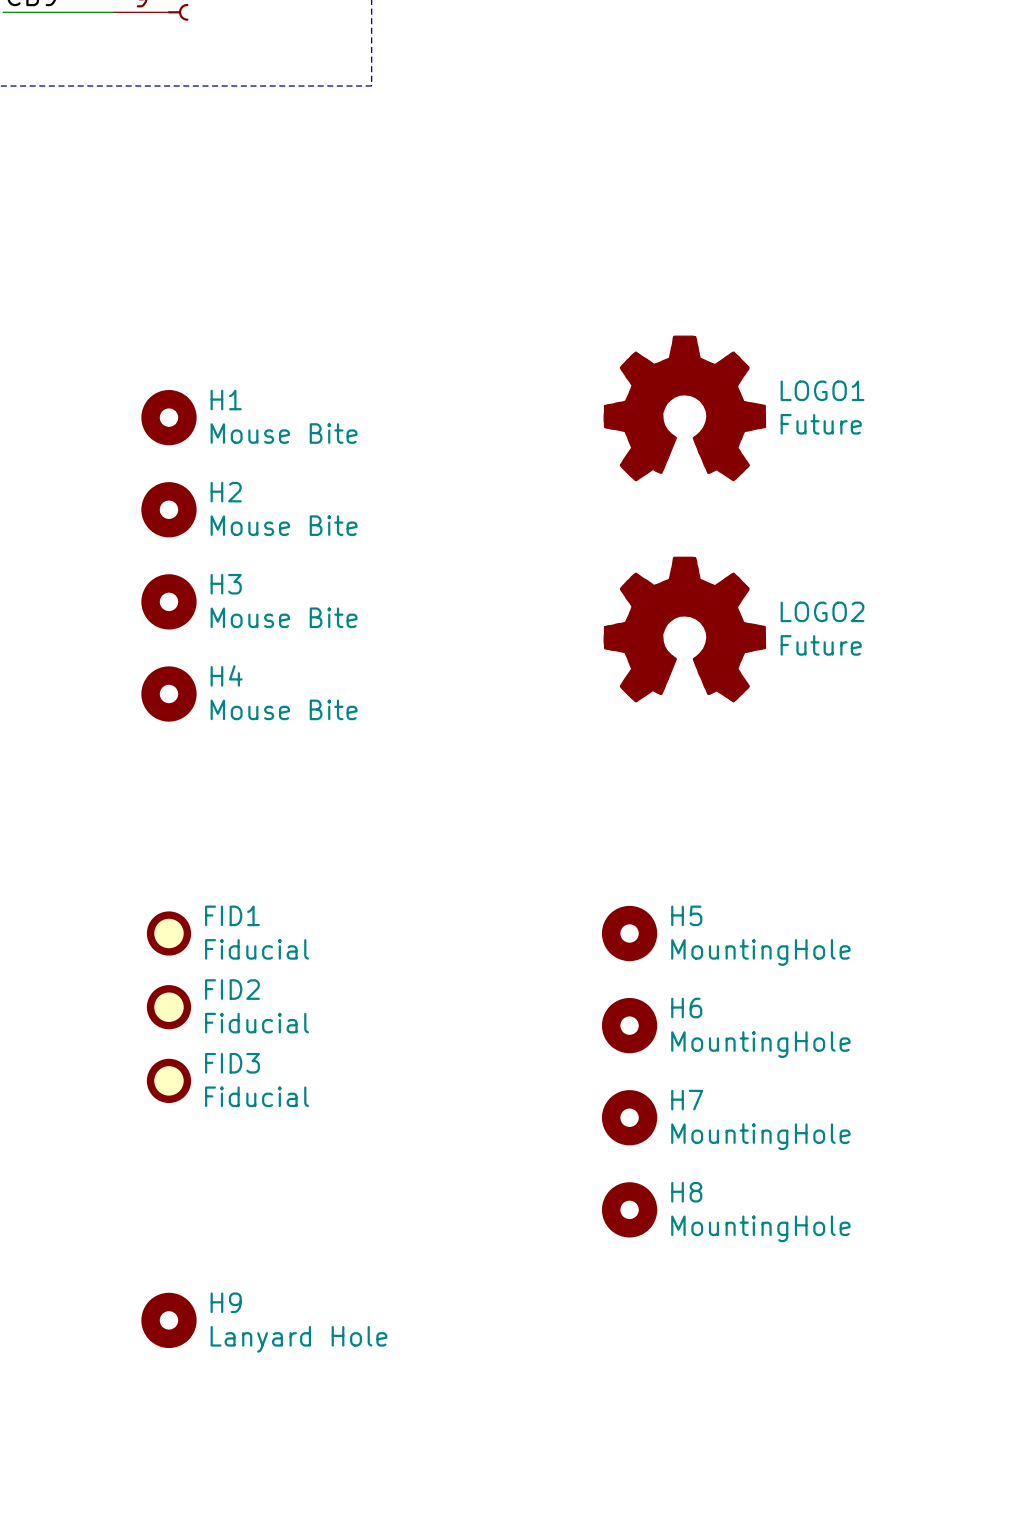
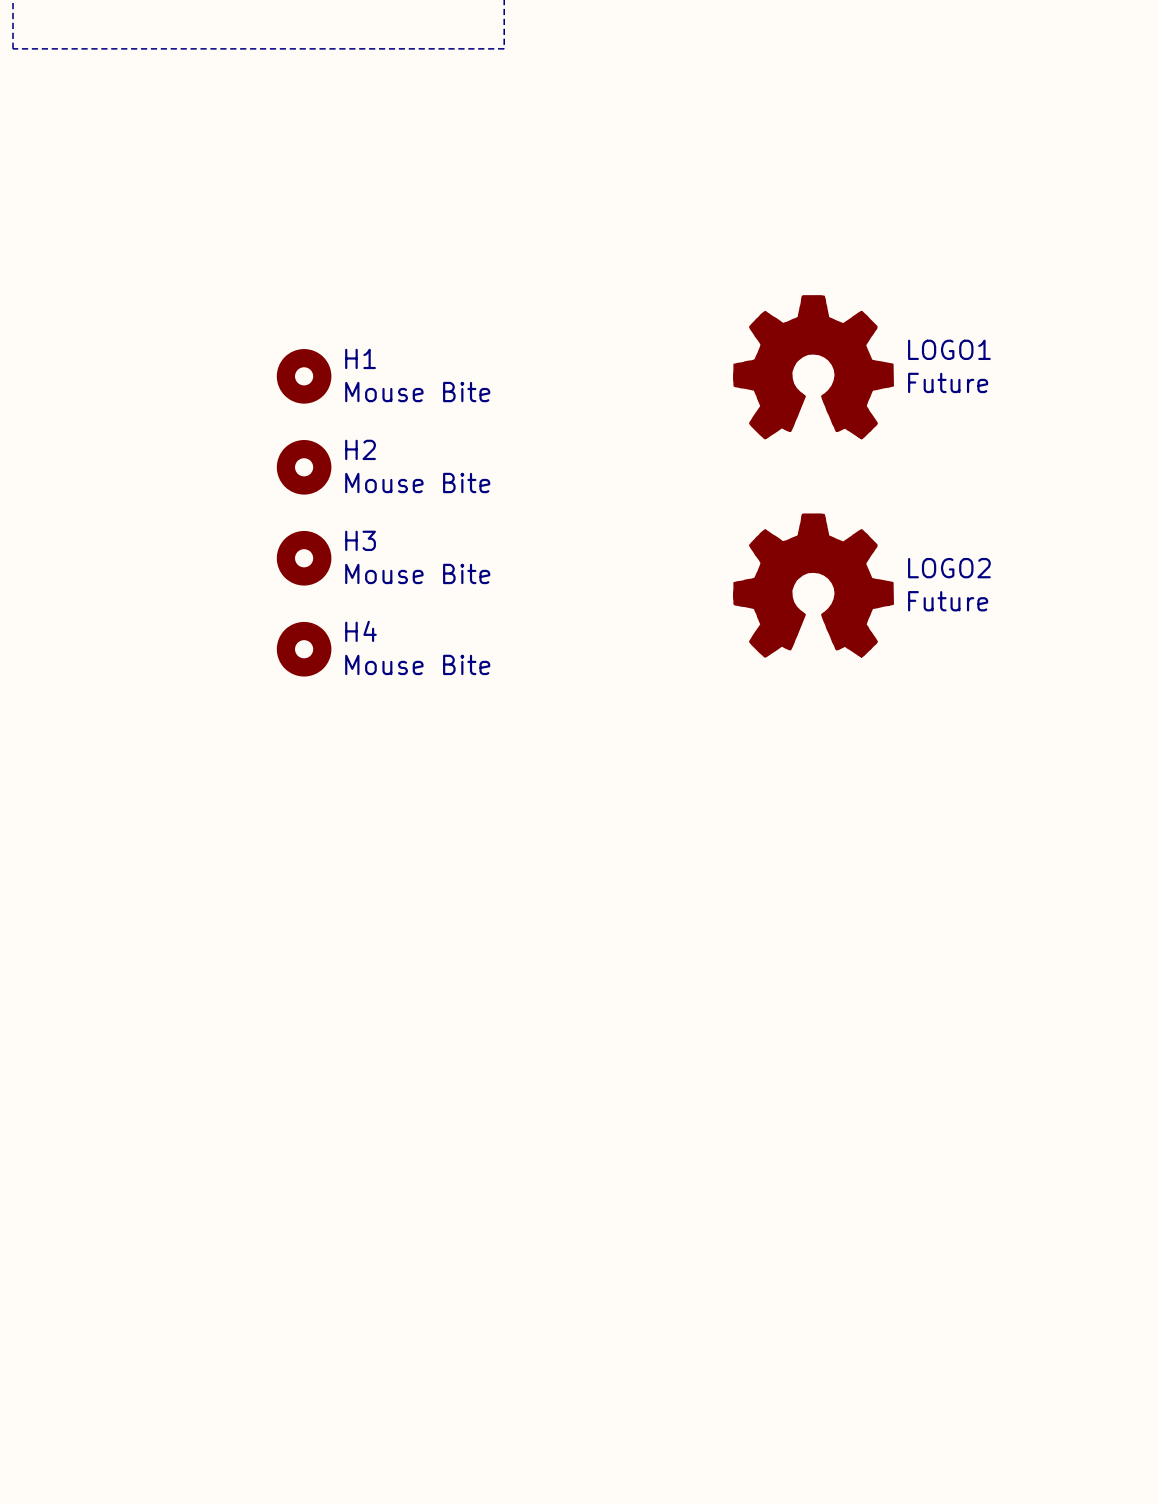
FID1: Fiducial (168, 933) -> none
H5: MountingHole (629, 933) -> none
FID2: Fiducial (168, 1007) -> none
H6: MountingHole (629, 1025) -> none
FID3: Fiducial (168, 1080) -> none
H7: MountingHole (629, 1117) -> none
H8: MountingHole (629, 1209) -> none
H9: Lanyard Hole (168, 1320) -> none

